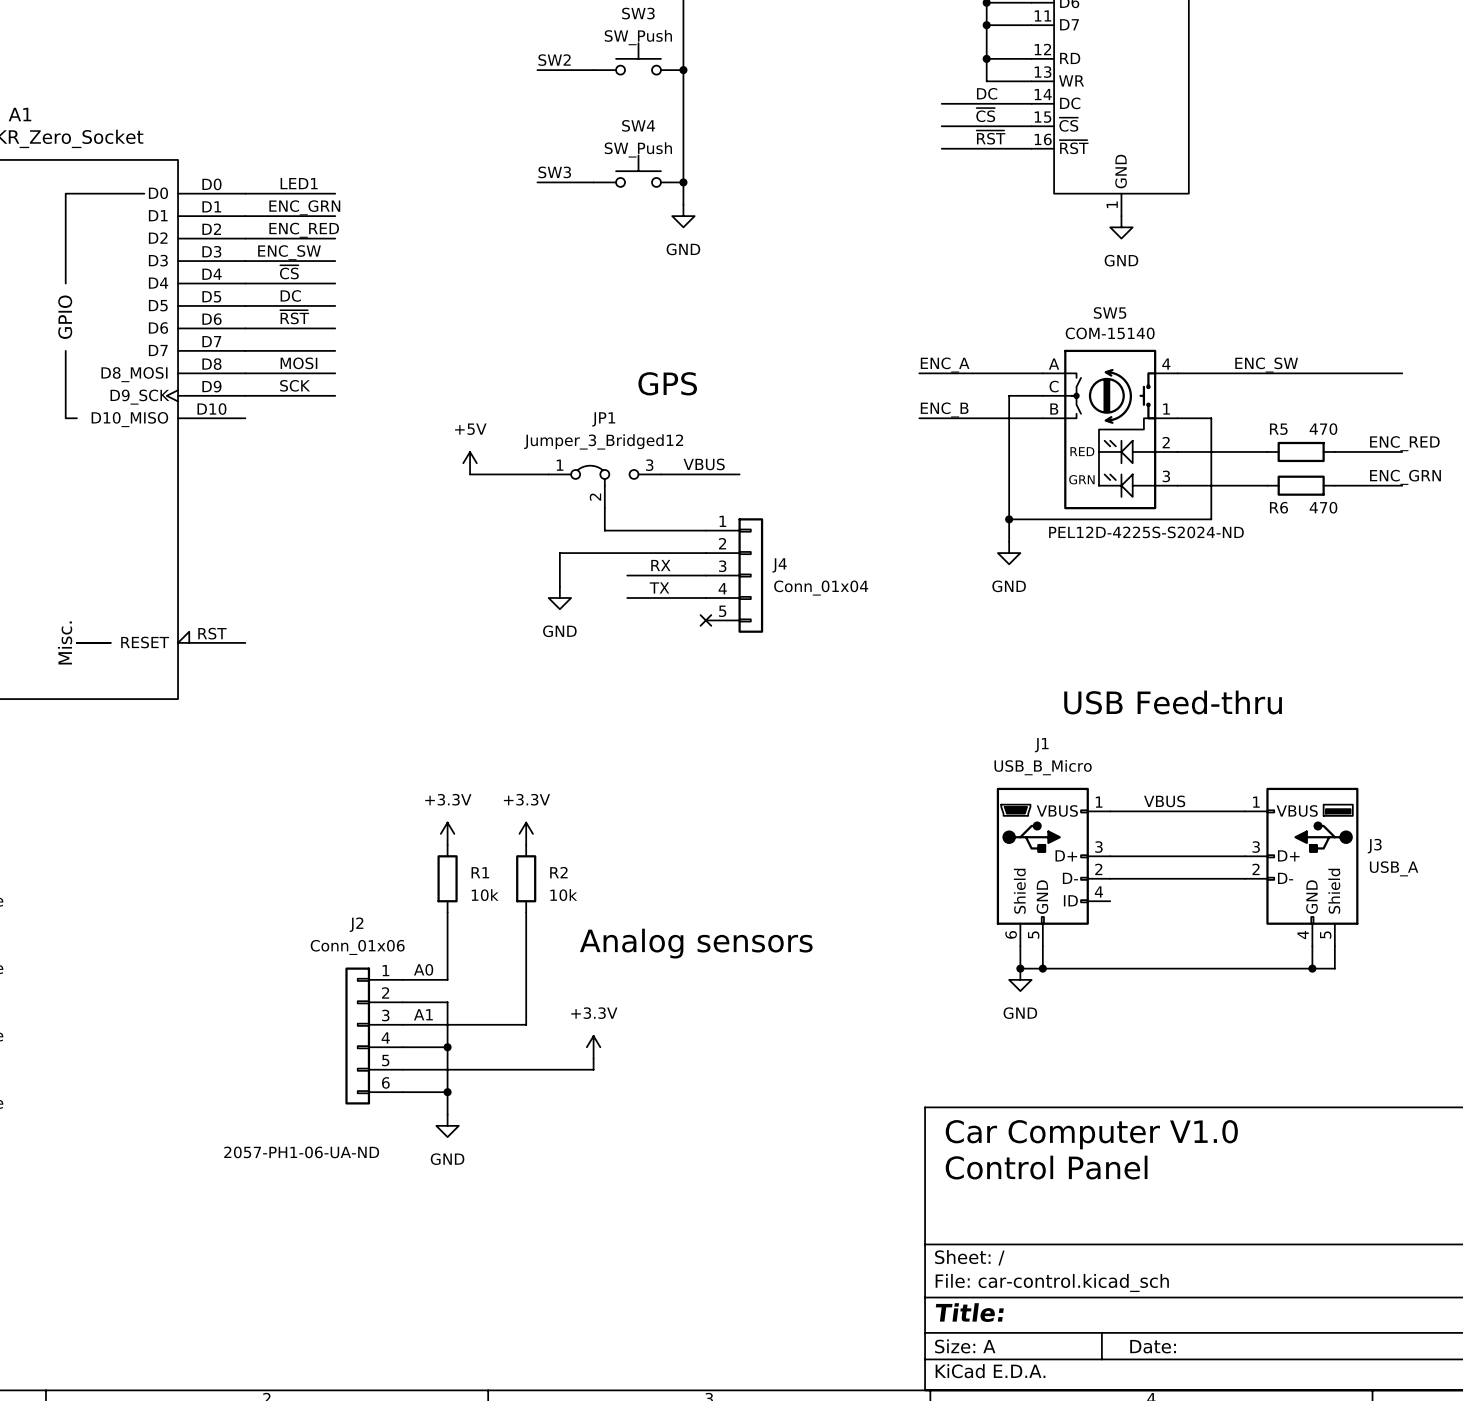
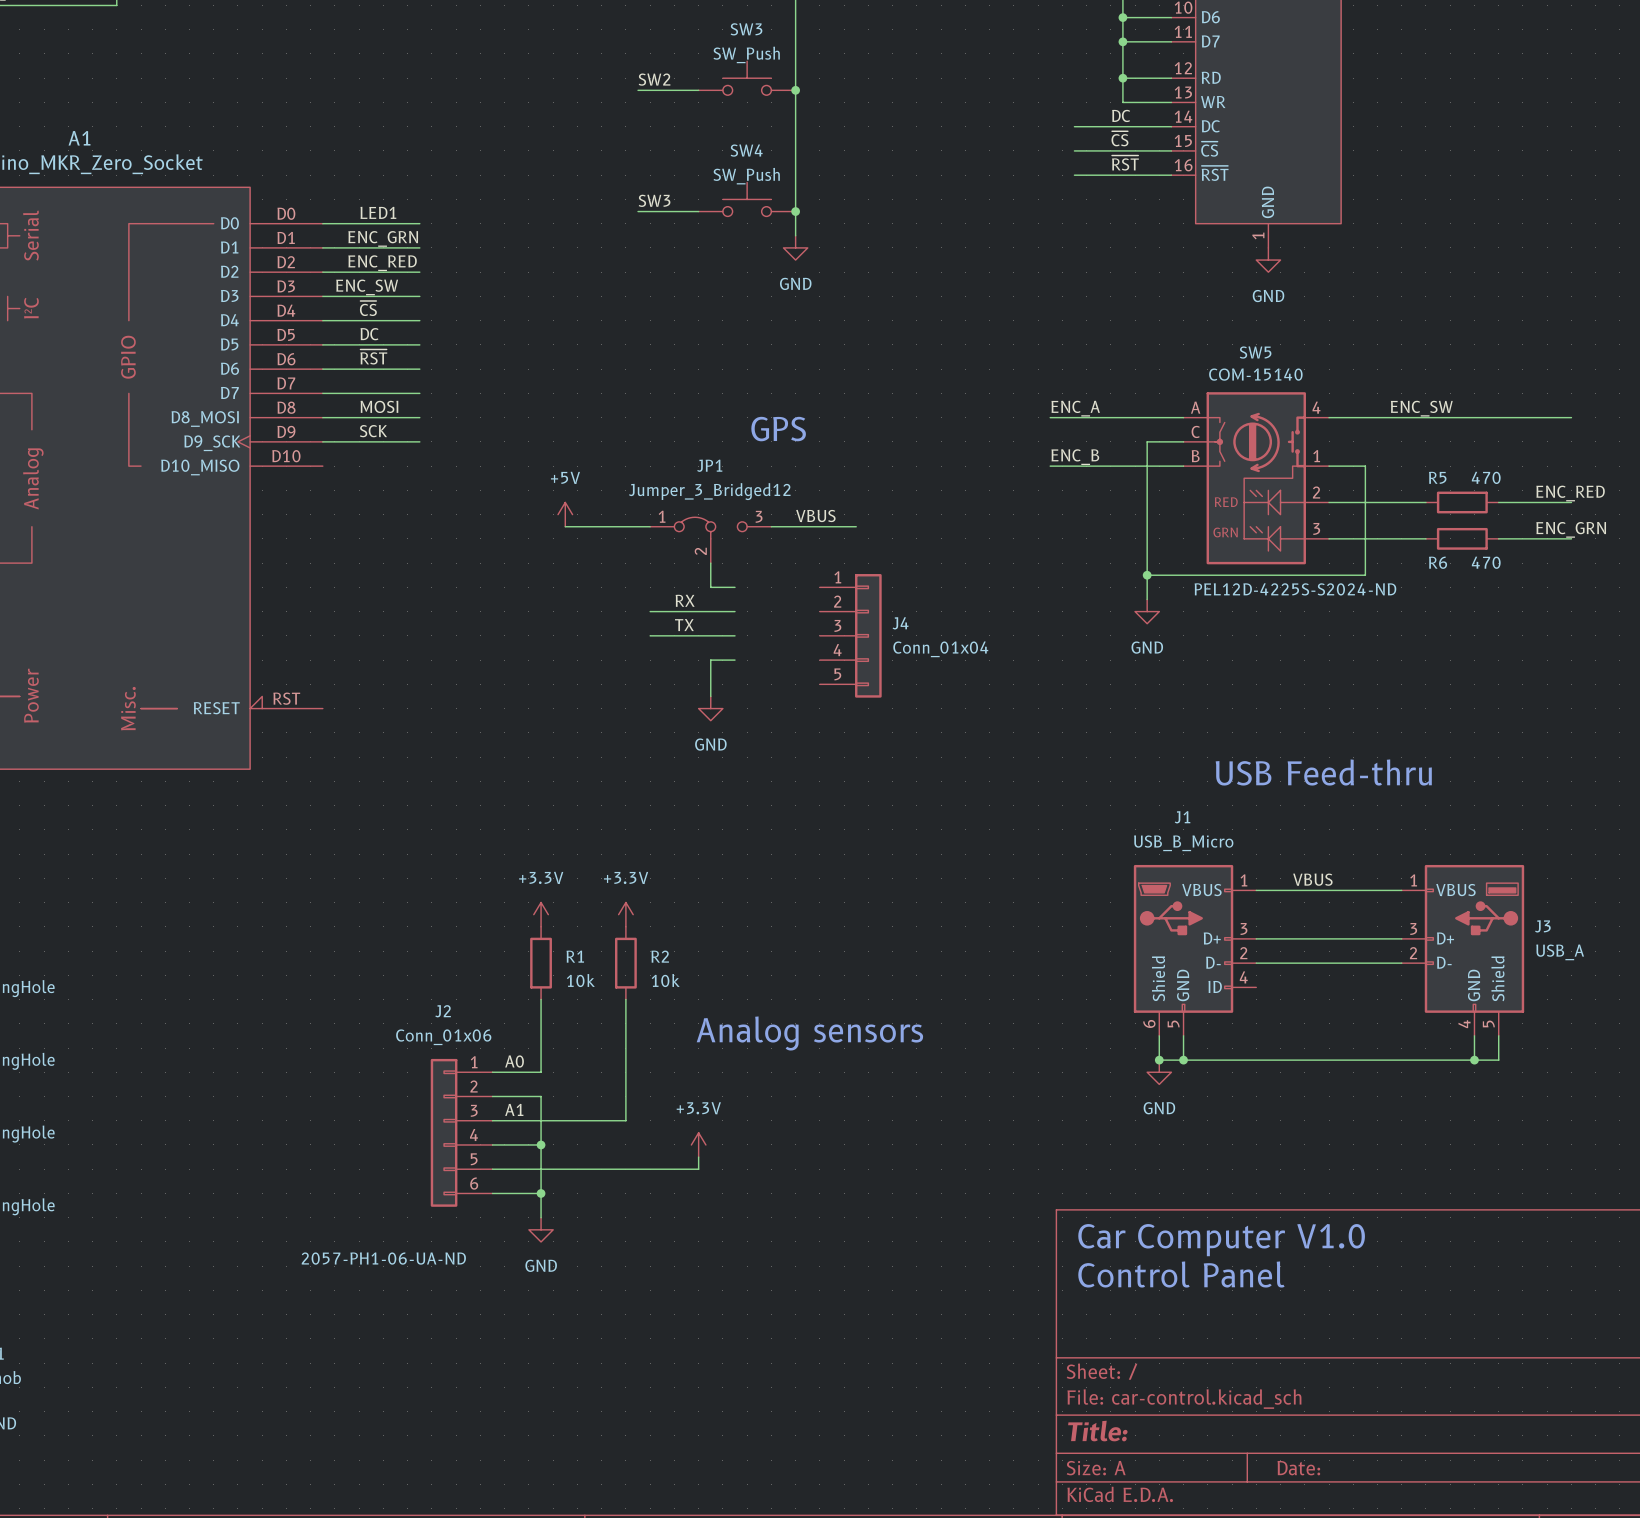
wire: (627, 530) (705, 530) -> none
wire: (559, 553) (559, 586) -> (662, 611) (650, 611)
wire: (627, 553) (705, 553) -> none
label position: RX (660, 565) -> RX (685, 600)
wire: (627, 575) (705, 575) -> (735, 635) (650, 635)
label position: TX (659, 587) -> TX (684, 625)
power symbol position: GND (559, 597) -> GND (710, 708)
wire: (627, 597) (705, 597) -> (735, 660) (710, 660) (710, 696)
no-connect mark: (705, 620) -> none

